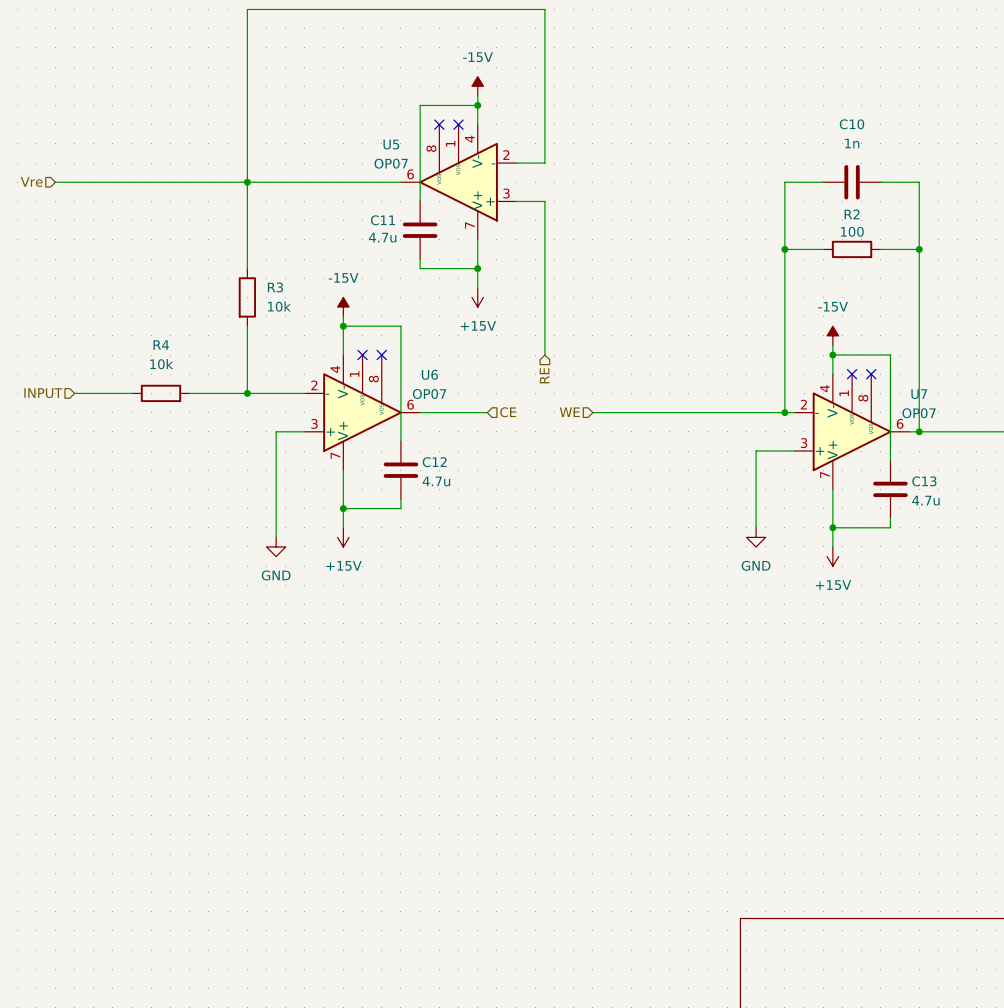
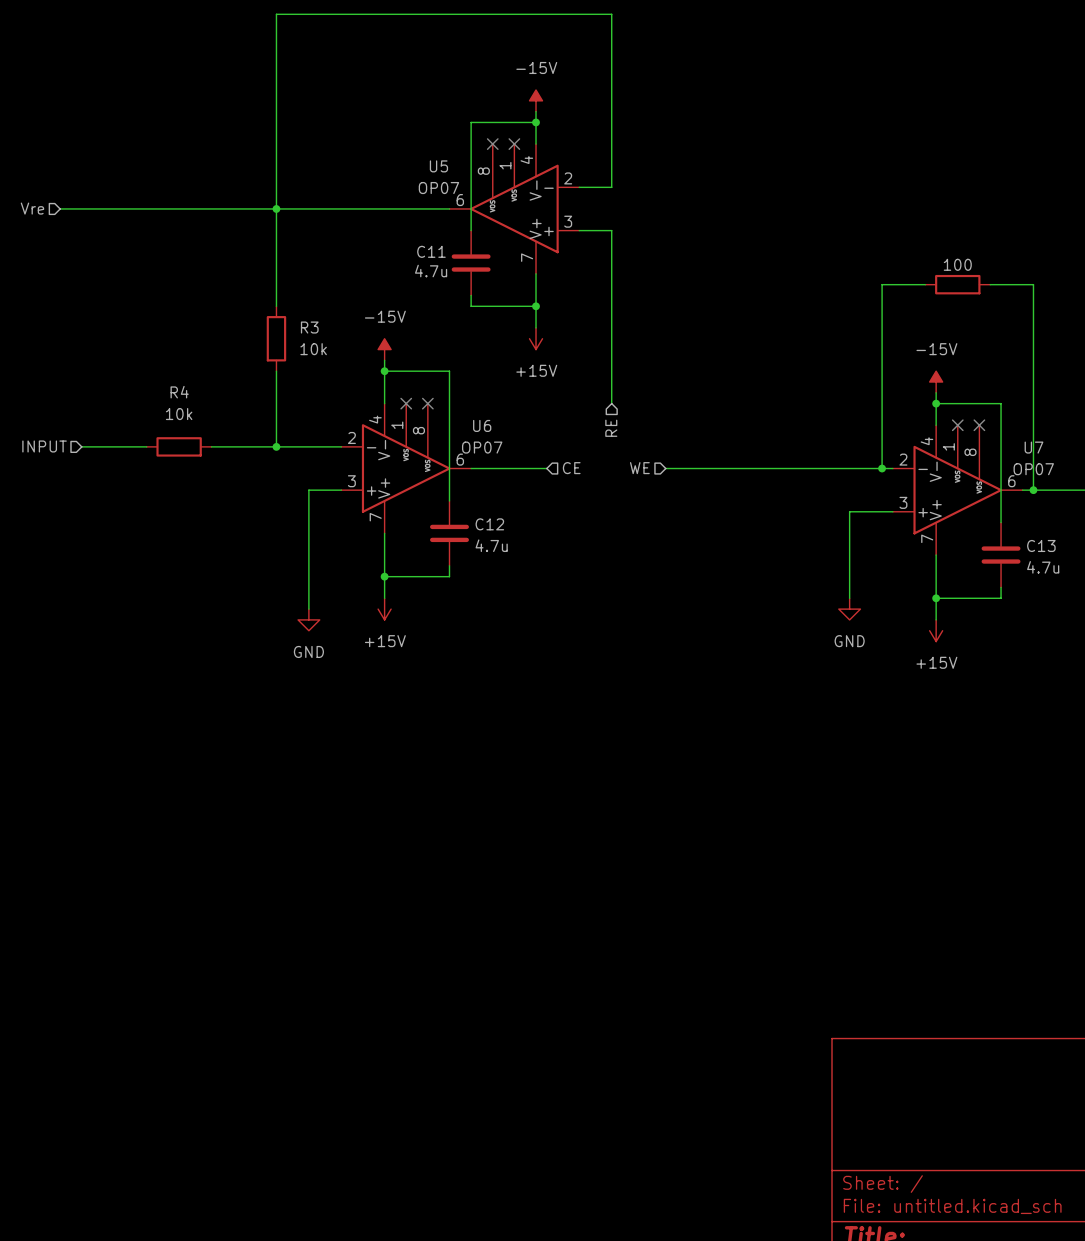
wire: (823, 182) (784, 182) (784, 249) -> none
C10: 1n (852, 182) -> none
wire: (880, 182) (919, 182) (919, 249) -> none
R2 name: R2 (852, 214) -> none
junction: (784, 249) -> none
junction: (919, 249) -> none

